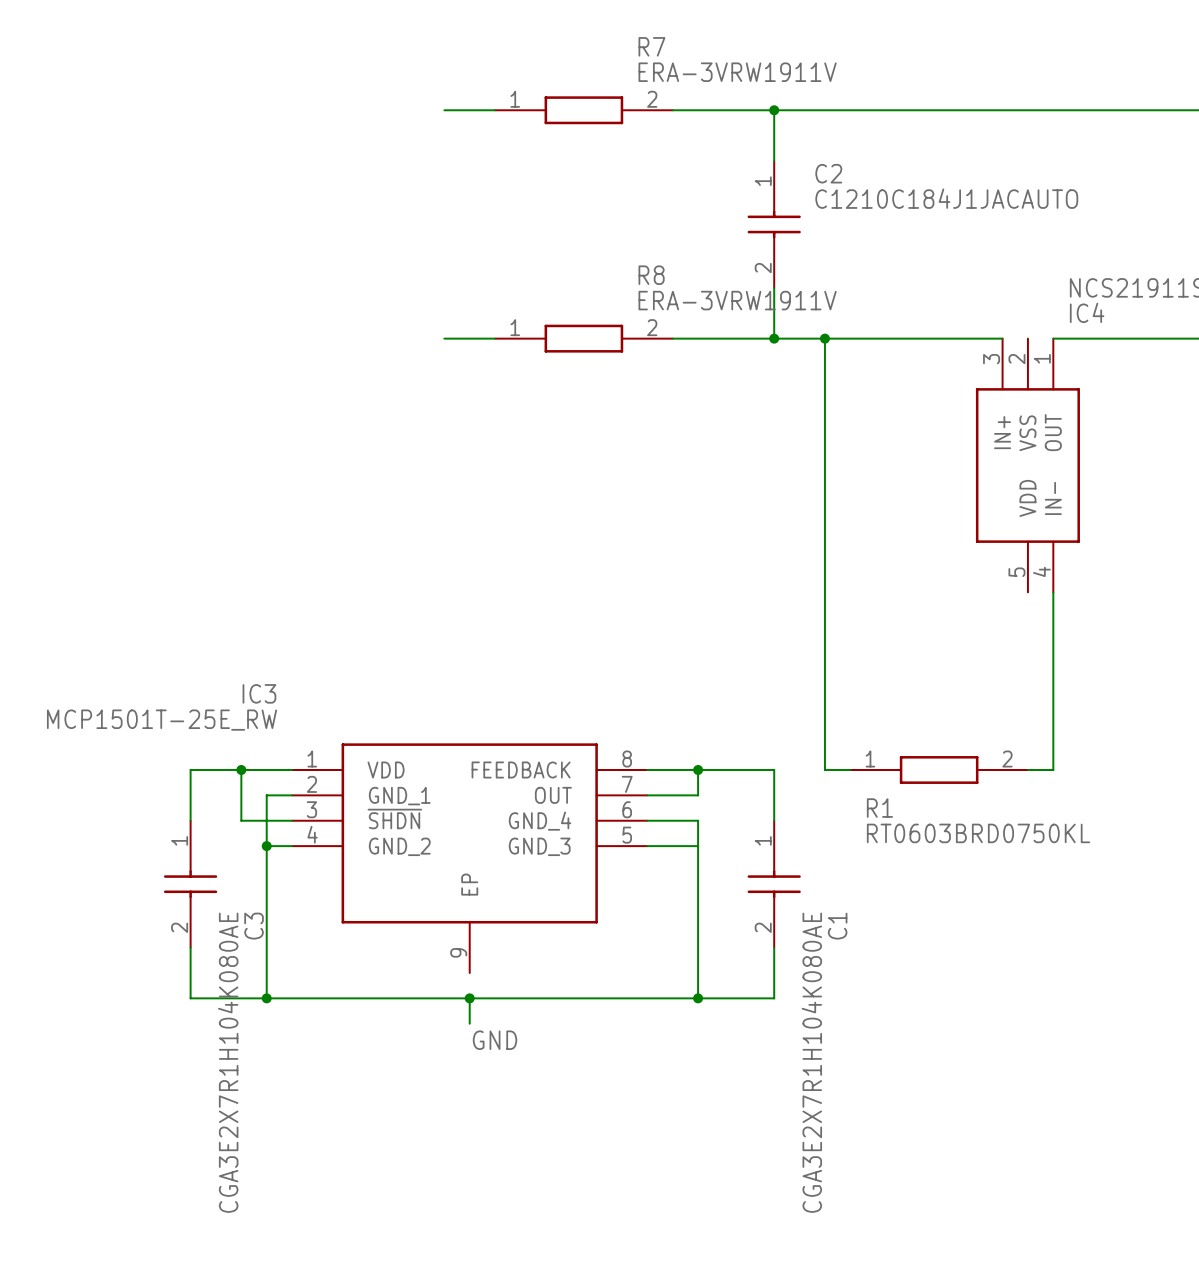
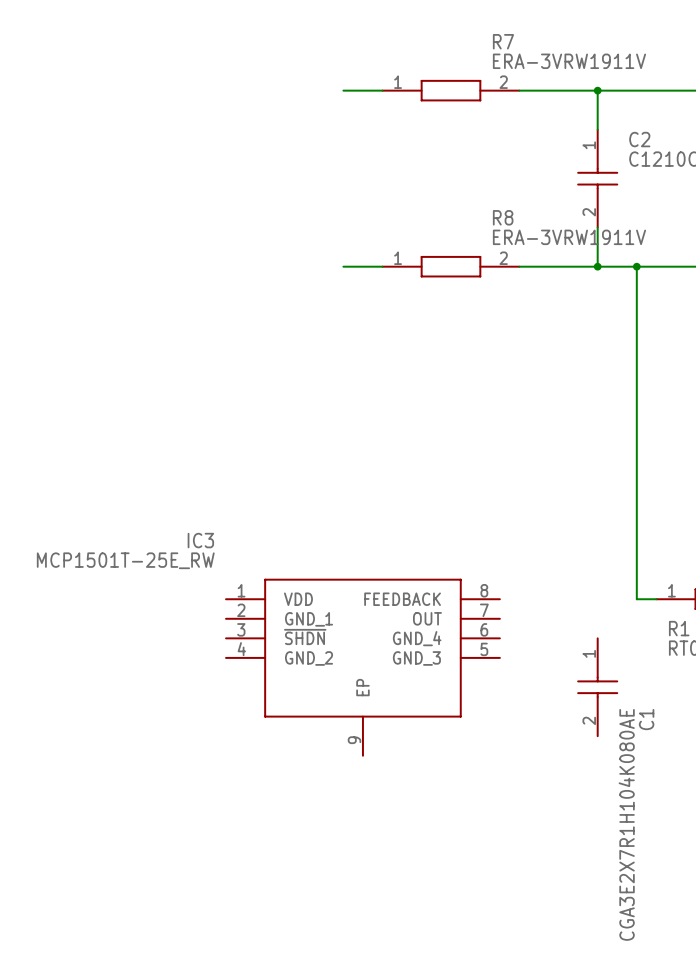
wire: (241, 769) (241, 820) (292, 820) -> none
junction: (241, 769) -> none
wire: (292, 769) (190, 769) (190, 820) -> none
wire: (647, 769) (774, 769) (774, 820) -> none
wire: (698, 769) (698, 795) (647, 795) -> none
junction: (698, 769) -> none
wire: (292, 795) (266, 795) (266, 998) -> none
wire: (647, 820) (698, 820) (698, 998) -> none
wire: (266, 846) (292, 846) -> none
junction: (266, 846) -> none
wire: (647, 846) (698, 846) -> none
C3: CGA3E2X7R1H104K080AE (190, 884) -> none
wire: (190, 947) (190, 998) (774, 998) (774, 947) -> none
junction: (266, 998) -> none
wire: (469, 998) (469, 1023) -> none
junction: (469, 998) -> none
junction: (698, 998) -> none
label: GND (495, 1040) -> none

